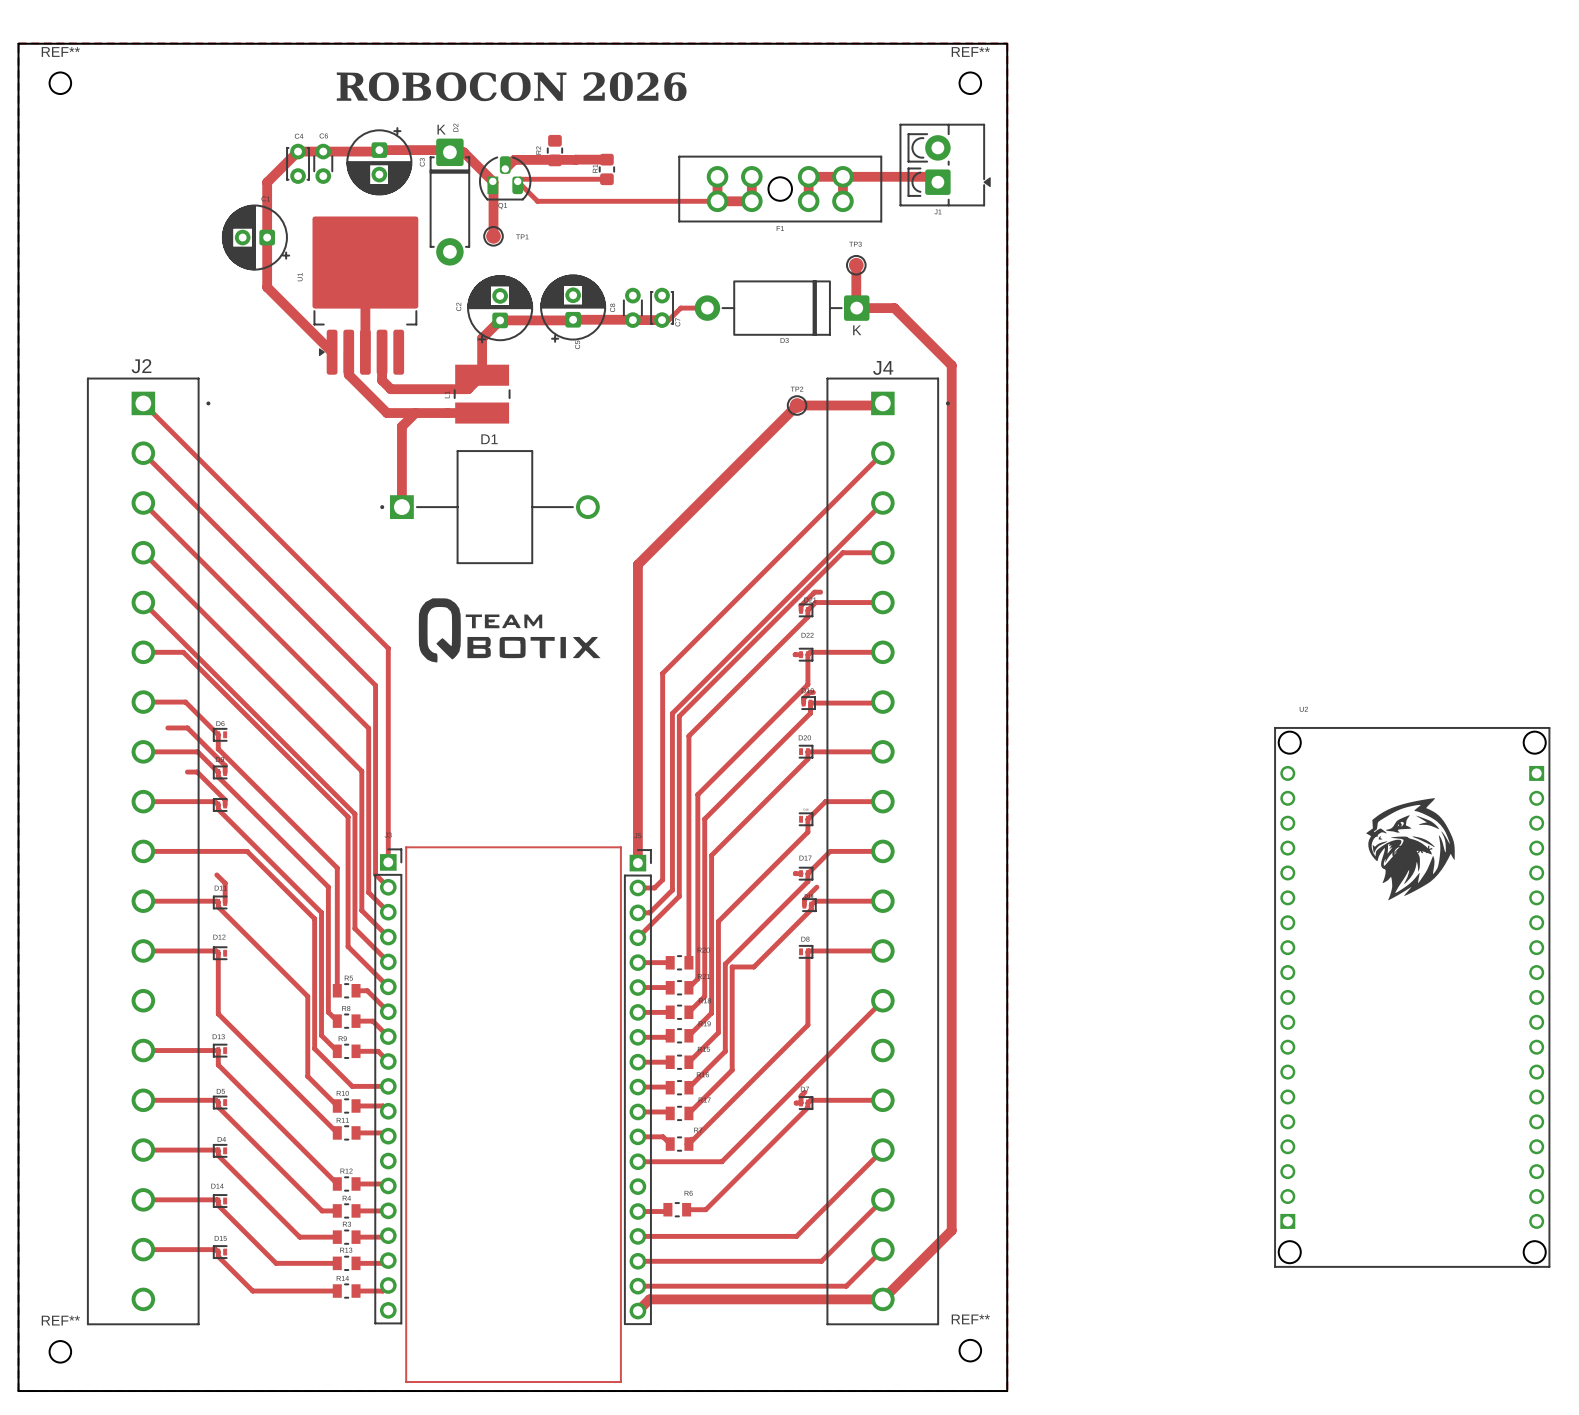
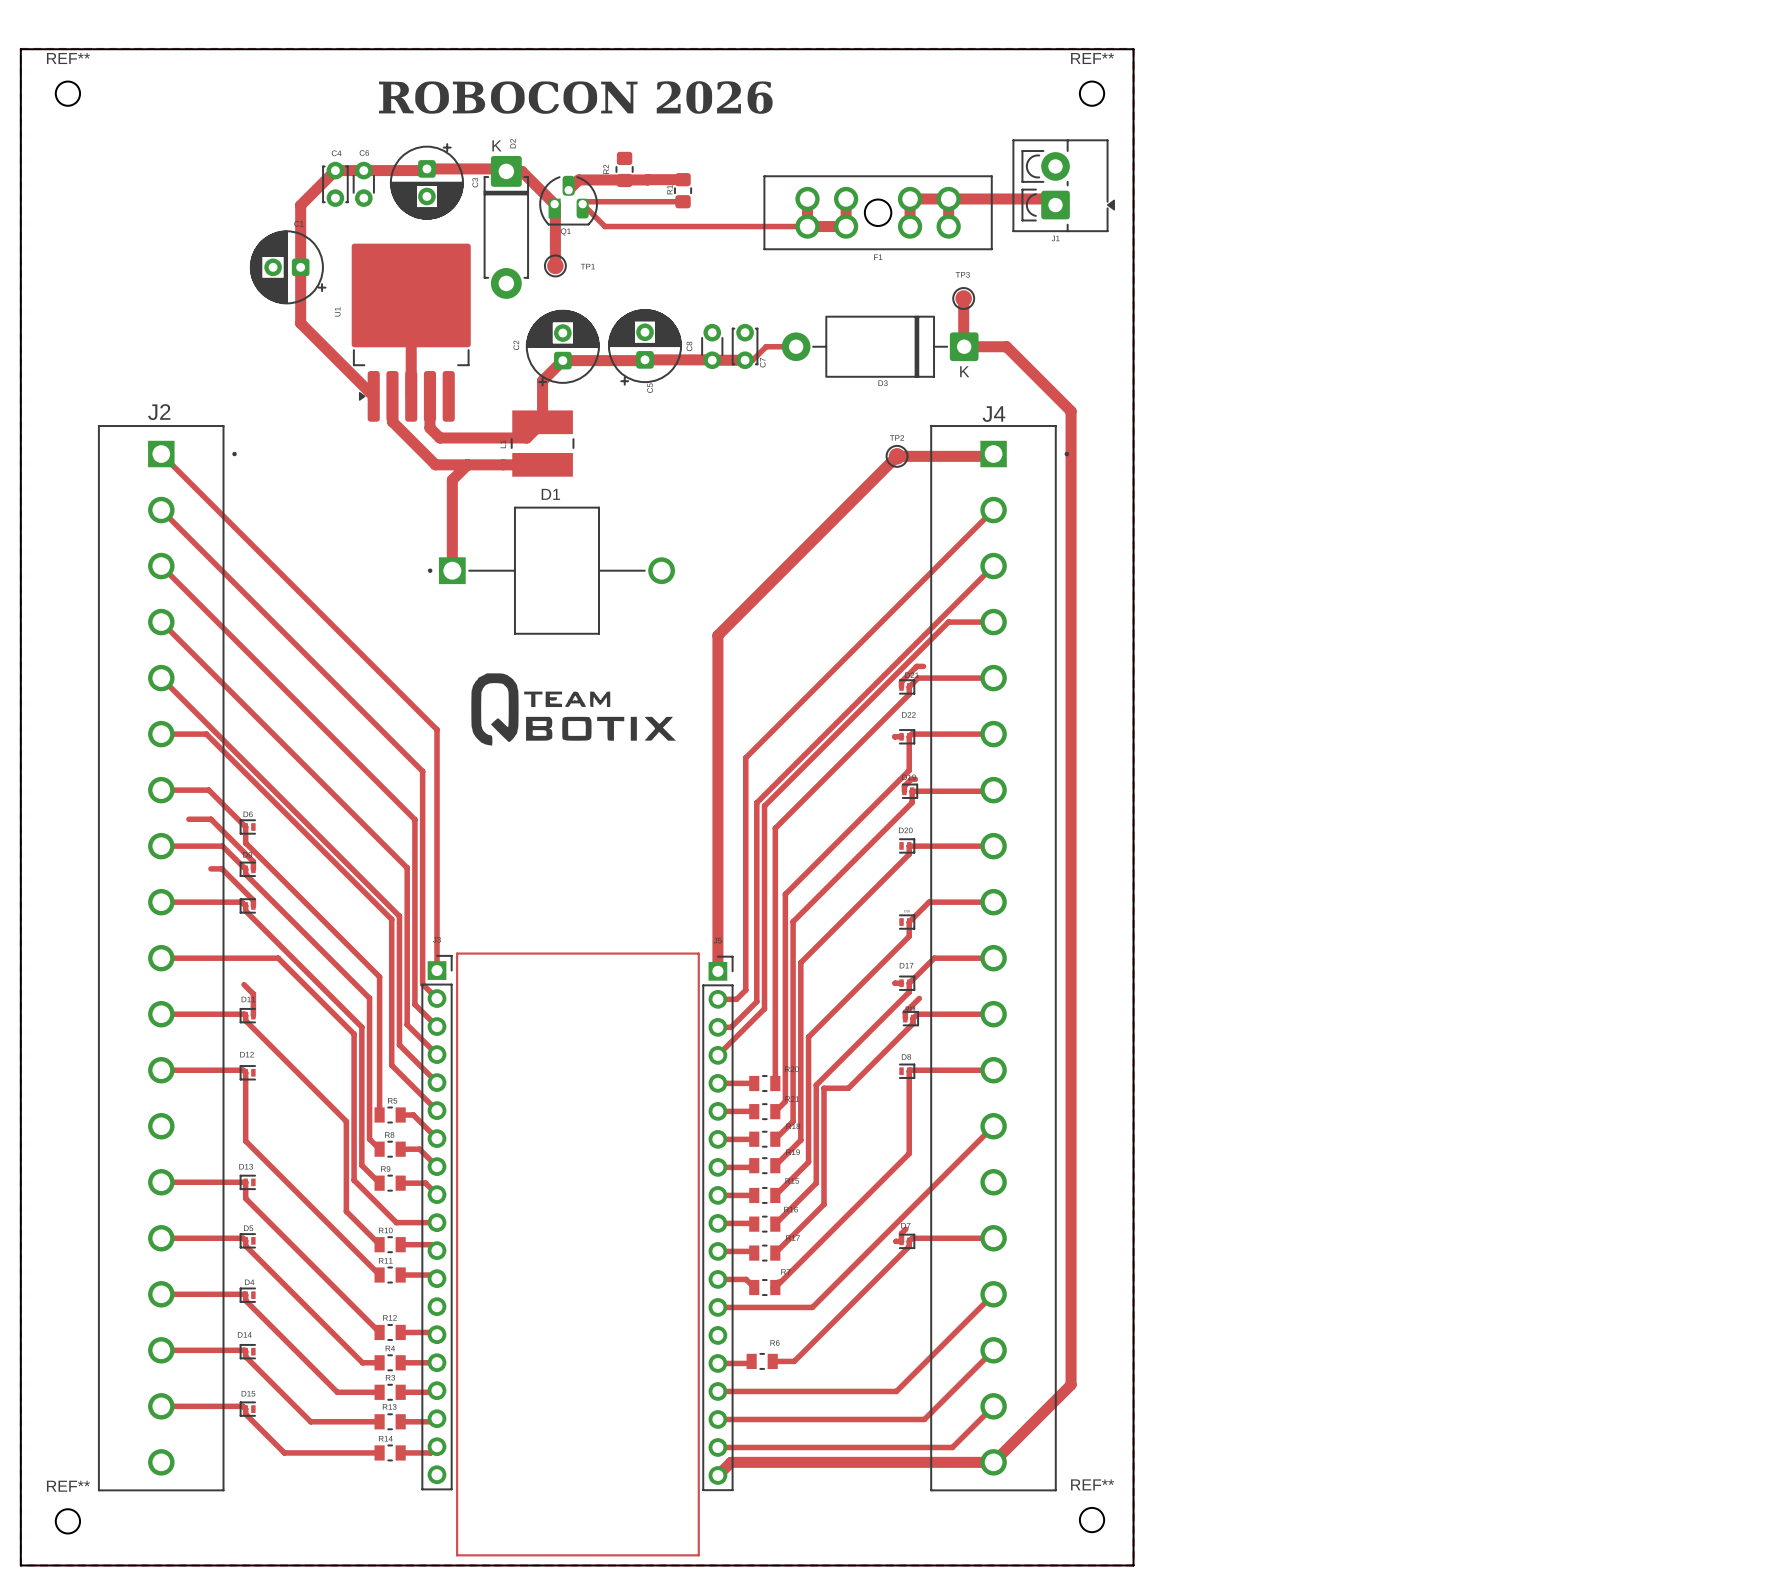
part: (1410, 849) -> none
part: (1412, 997) -> none

